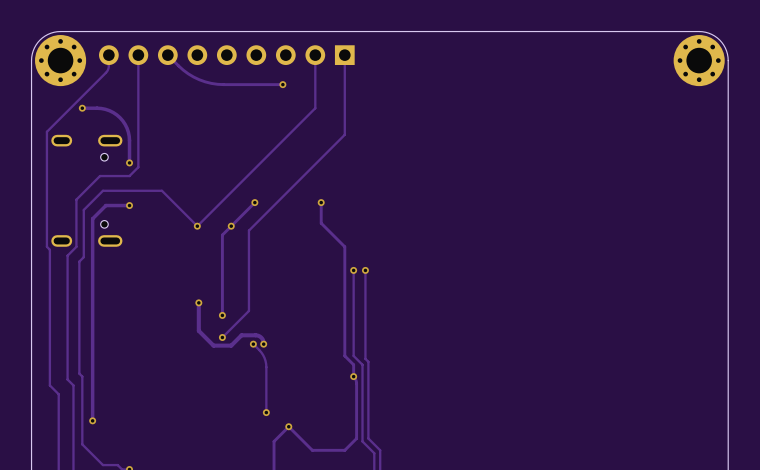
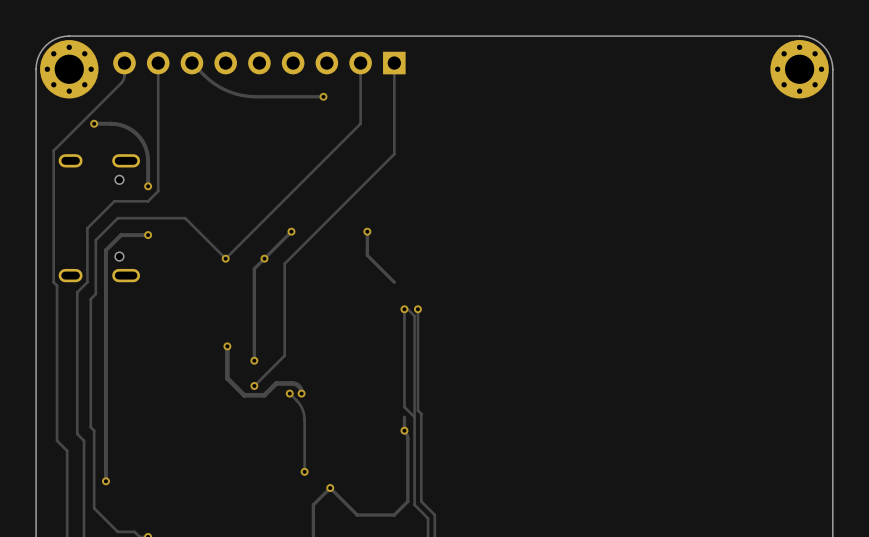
track: (344, 246) (344, 355) (353, 364) -> none
track: none -> (407, 309) (414, 316) (414, 417)

